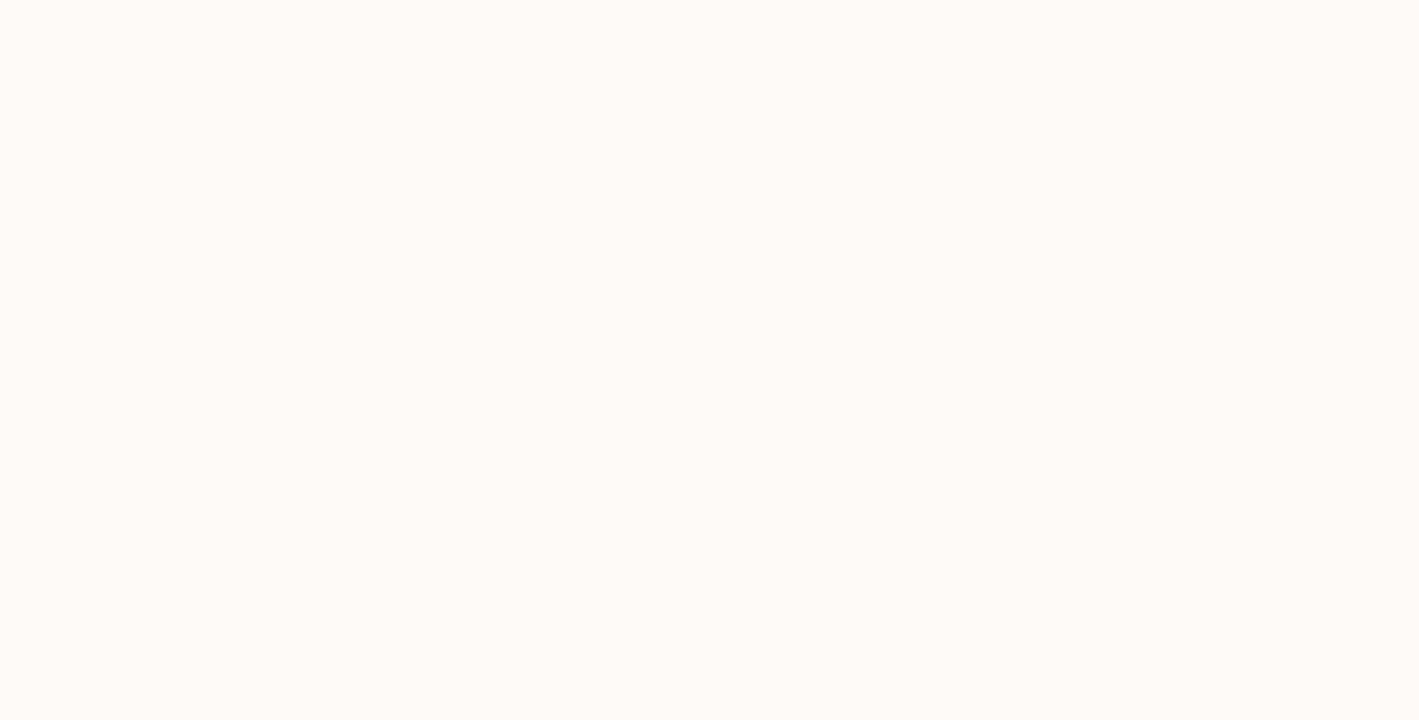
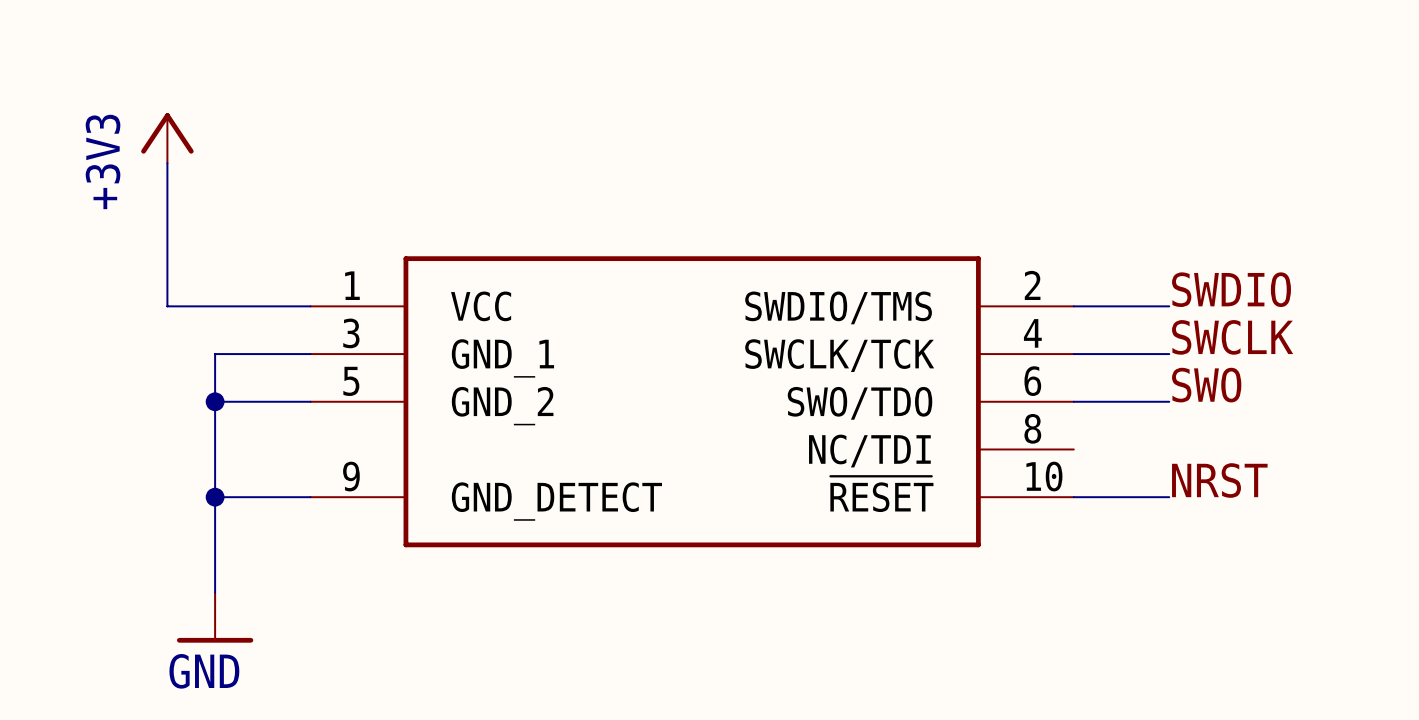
power symbol: none -> +3V3 (167, 138)
wire: none -> (167, 163) (167, 306) (310, 306)
label: none -> SWDIO (1231, 289)
wire: none -> (1073, 306) (1169, 306)
label: none -> SWCLK (1232, 337)
wire: none -> (310, 354) (215, 354) (215, 592)
wire: none -> (1073, 354) (1169, 354)
label: none -> SWO (1206, 385)
wire: none -> (215, 401) (310, 401)
junction: none -> (215, 401)
part: none -> (692, 401)
wire: none -> (1073, 401) (1169, 401)
label: none -> NRST (1219, 480)
wire: none -> (215, 497) (310, 497)
junction: none -> (215, 497)
wire: none -> (1073, 497) (1169, 497)
power symbol: none -> GND (215, 617)

